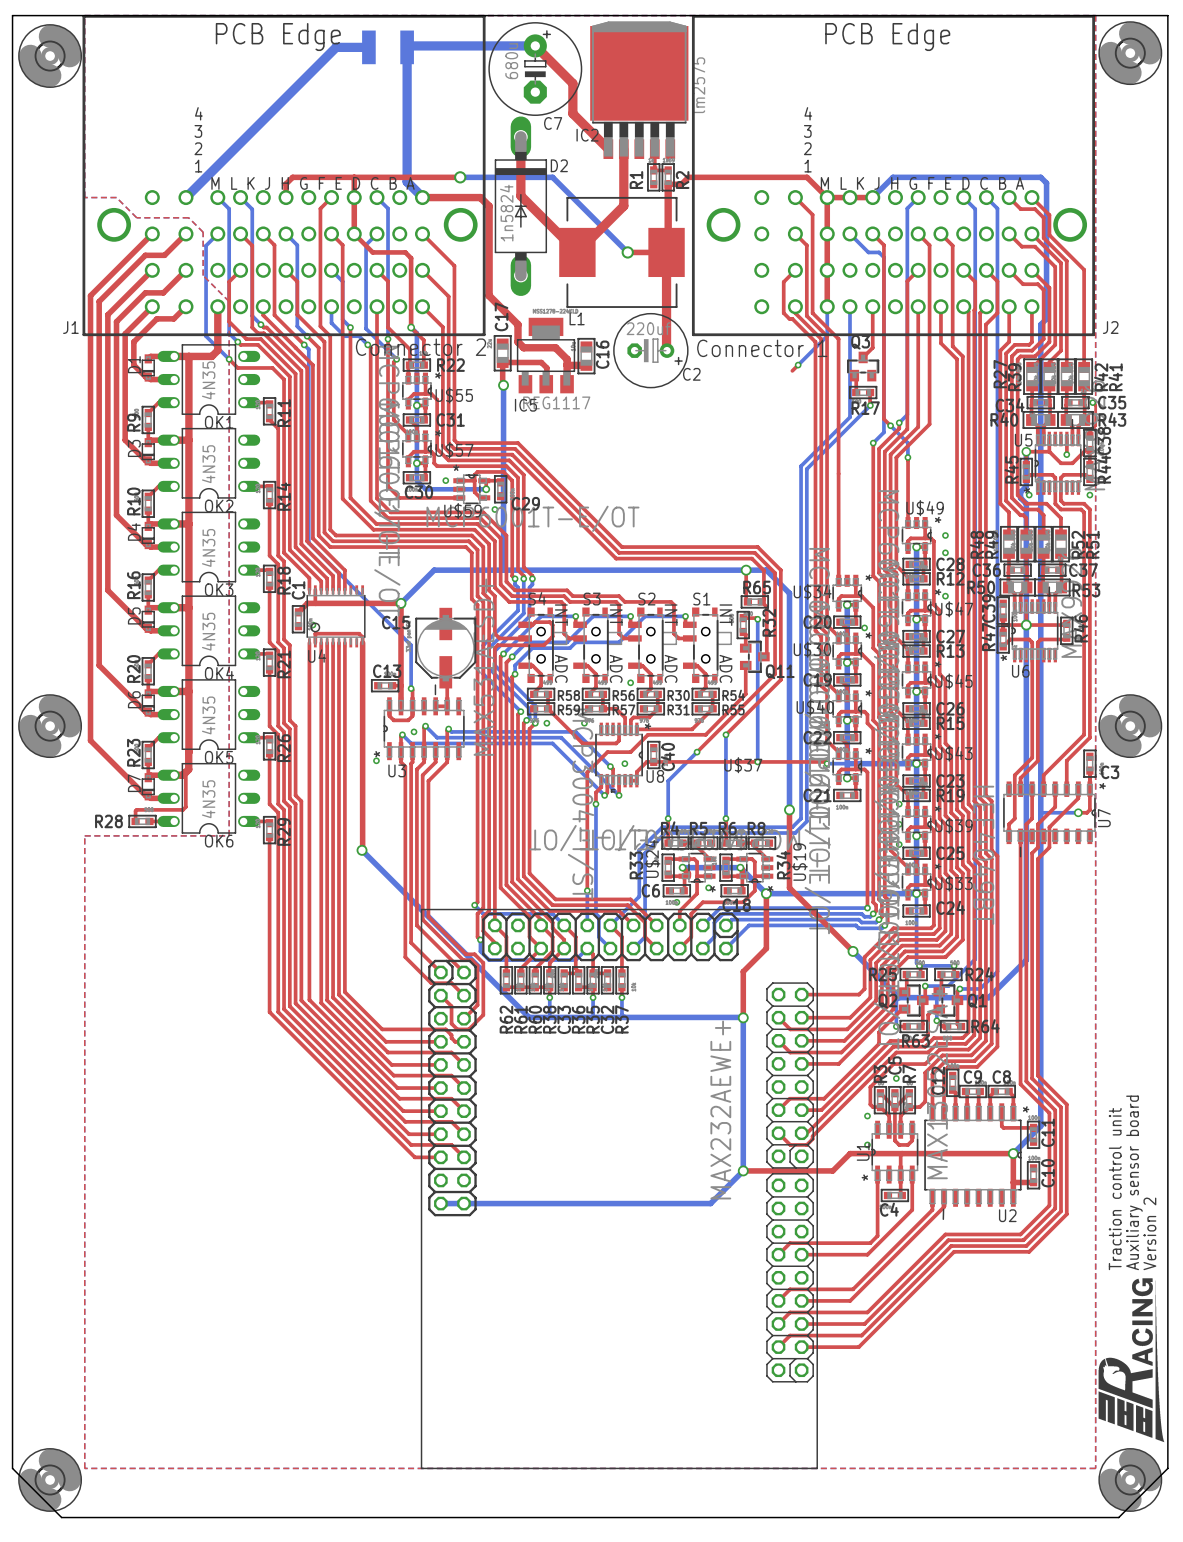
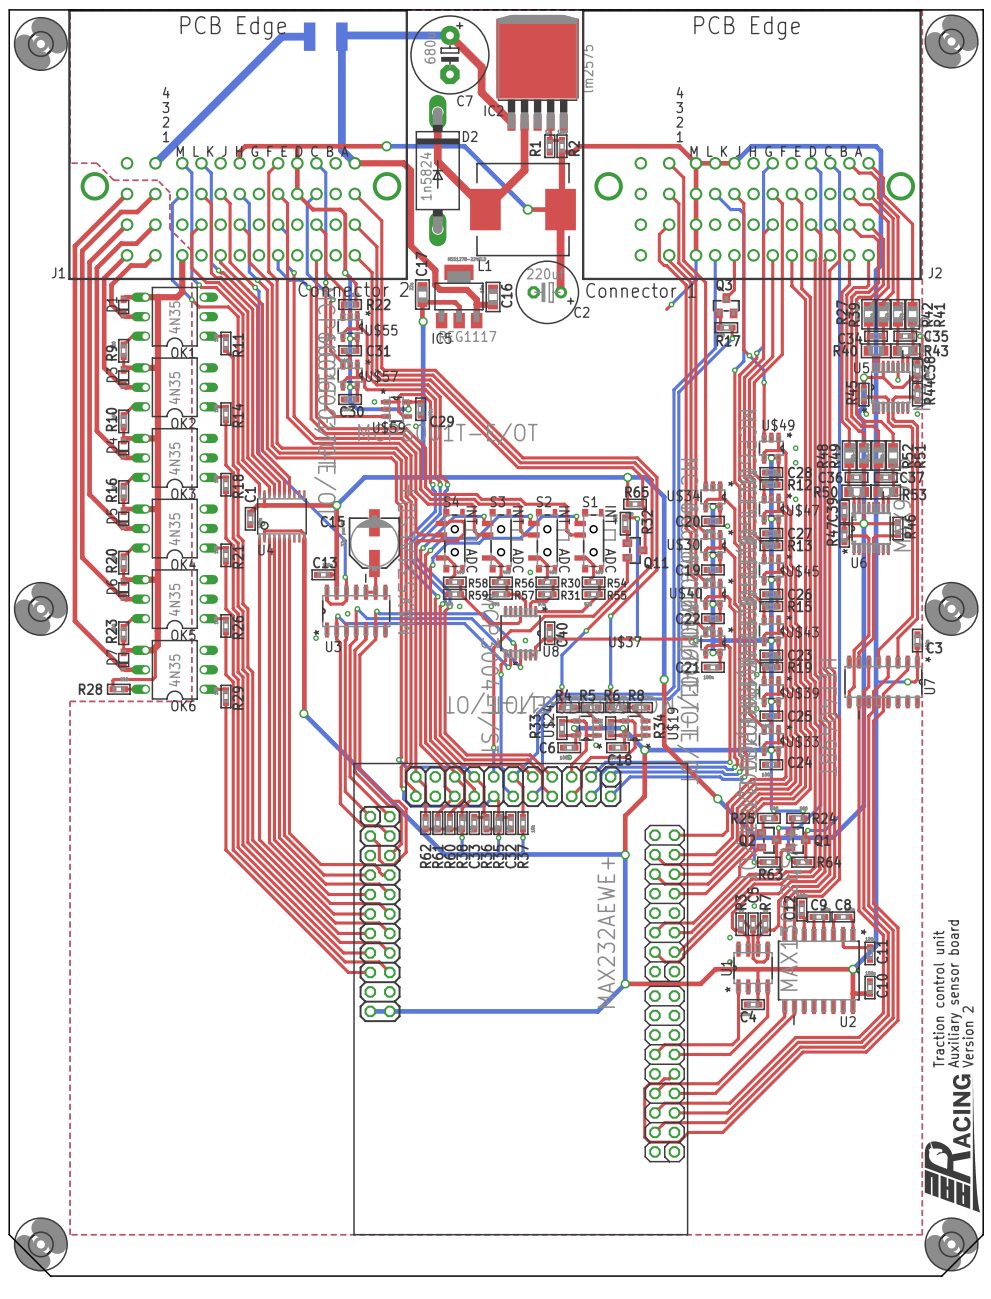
top track: (801, 1347) (818, 1347) -> (674, 1073) (659, 1083) (649, 1083) (644, 1088) (644, 1137) (649, 1142) (678, 1142) (688, 1132)

